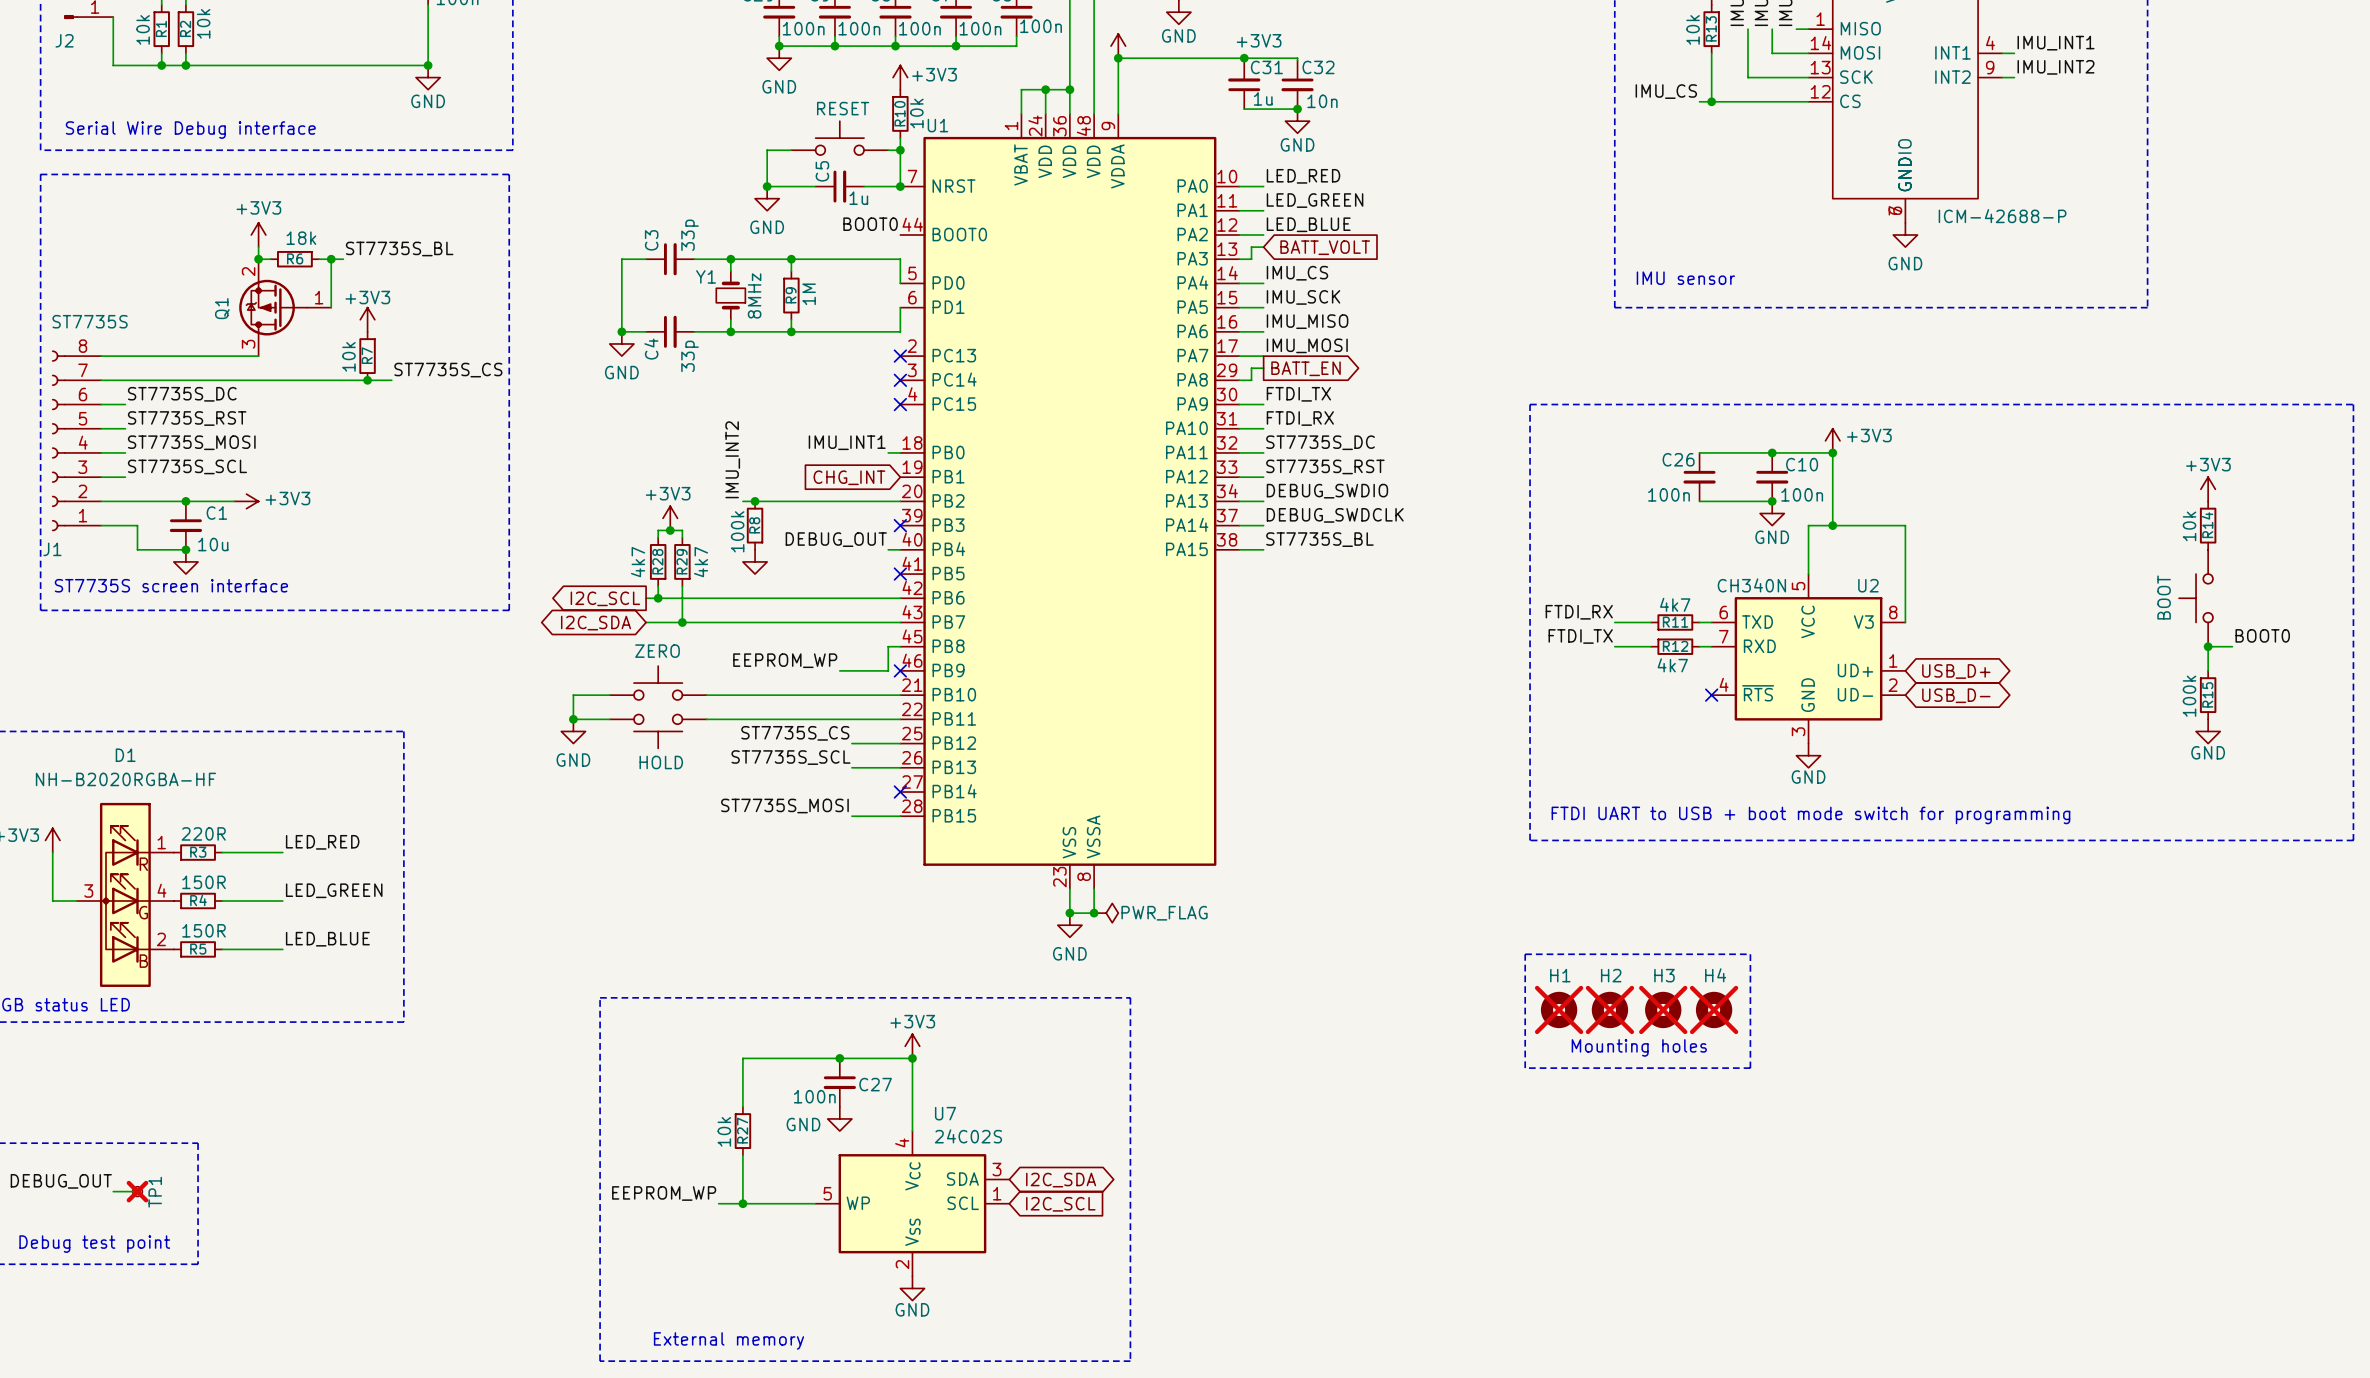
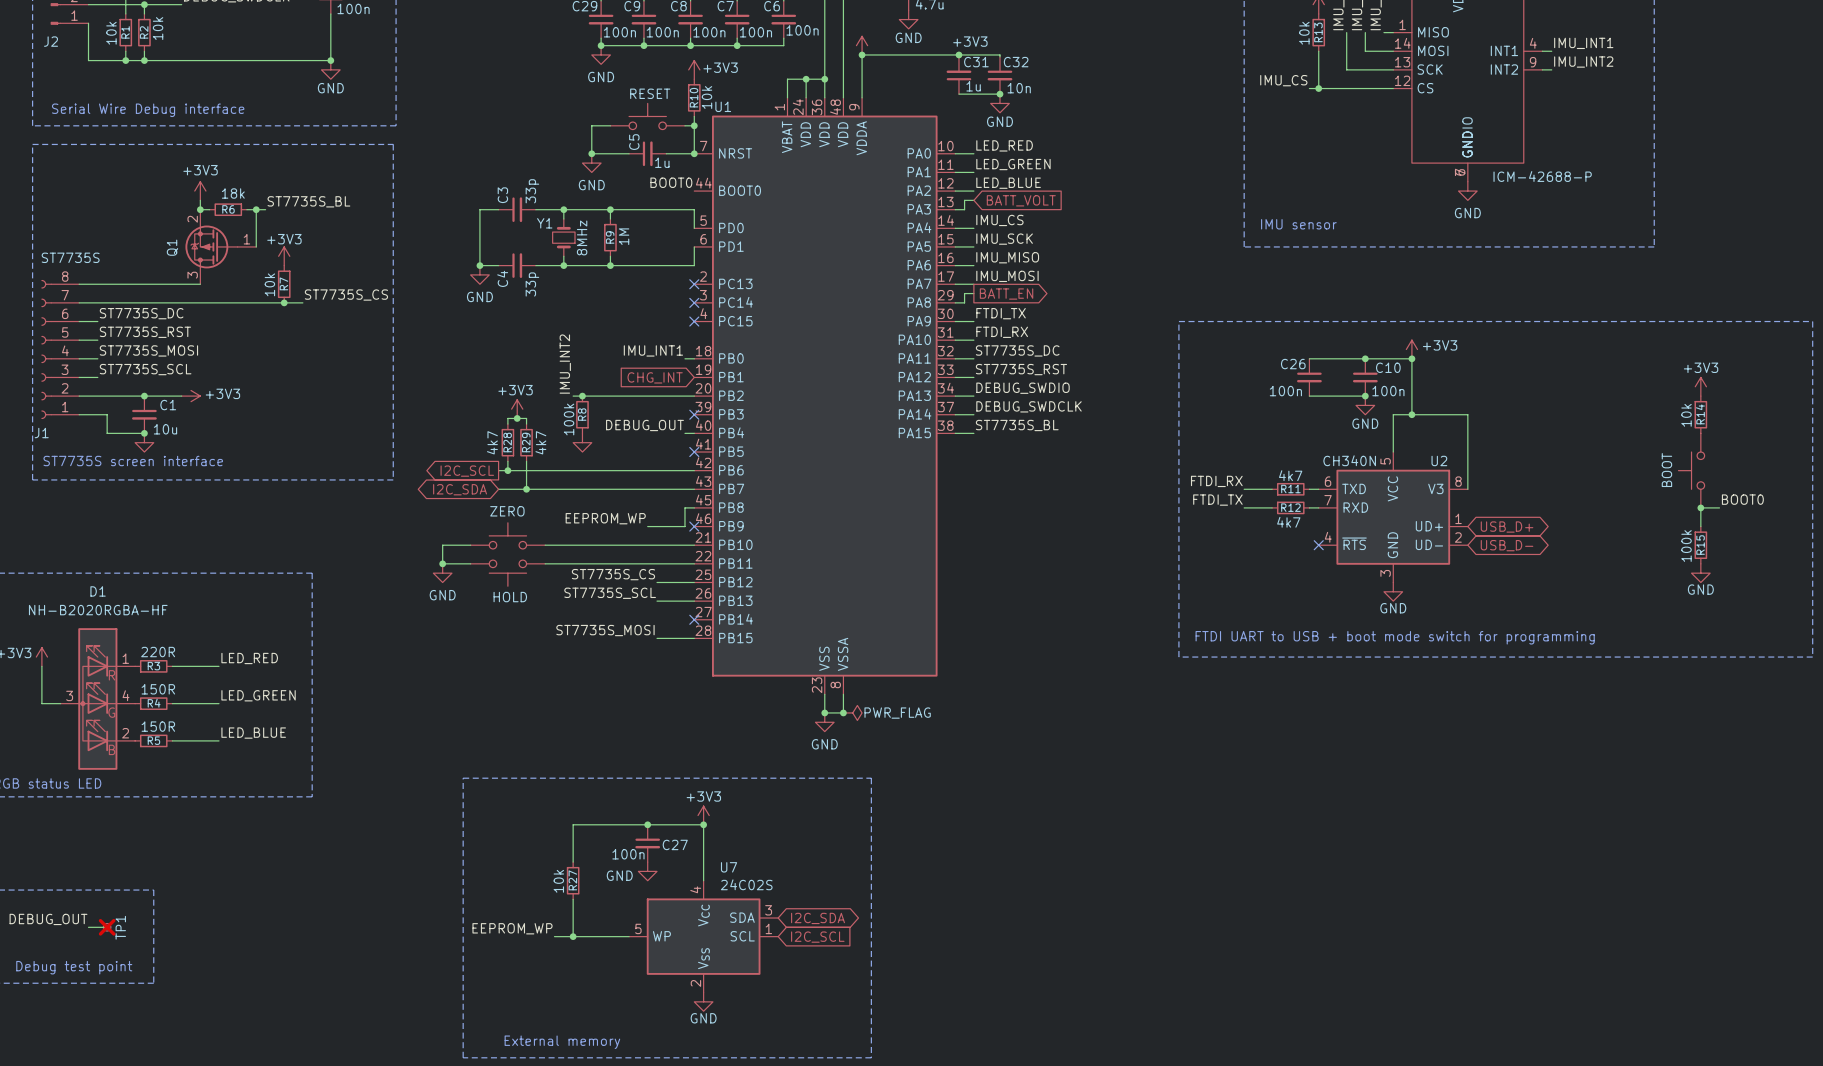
line: (1525, 954) (1750, 954) (1750, 1068) (1525, 1068) (1525, 954) -> none
H1: (1559, 1009) -> none
H2: (1609, 1009) -> none
H3: (1663, 1009) -> none
H4: (1714, 1009) -> none
text: Mounting holes (1639, 1047) -> none

